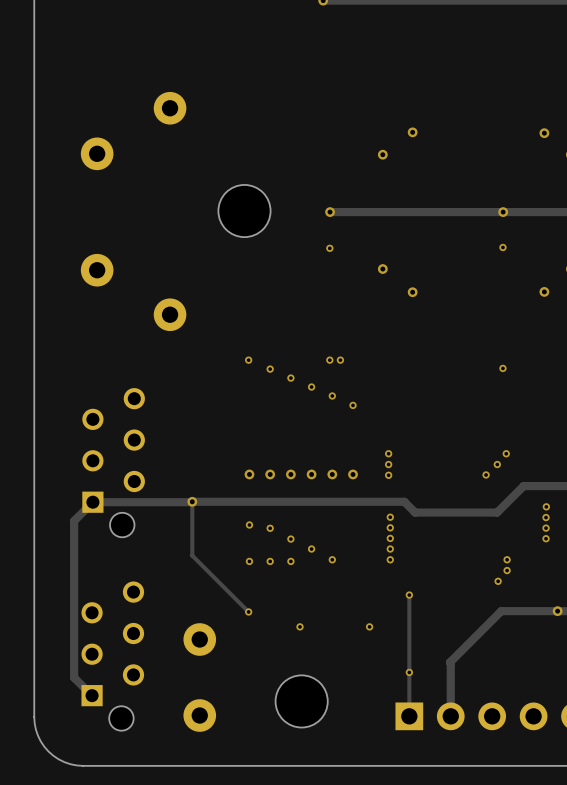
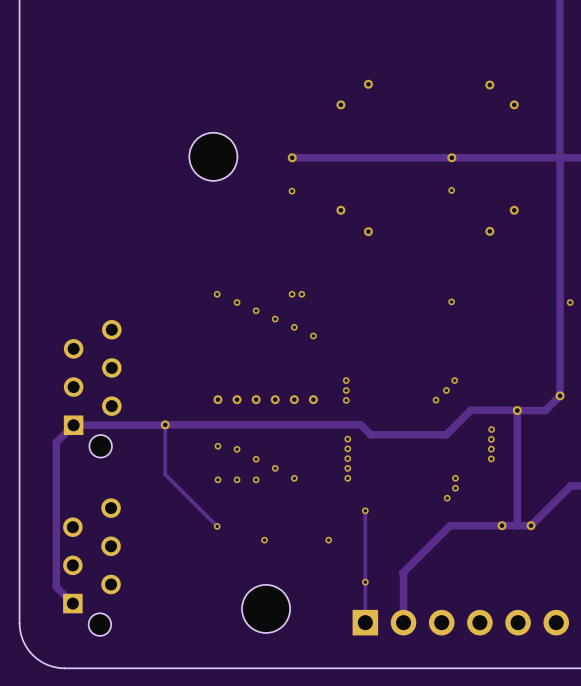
part: (170, 108) -> none
part: (97, 153) -> none
part: (97, 270) -> none
part: (170, 314) -> none
part: (199, 639) -> none
part: (199, 715) -> none

